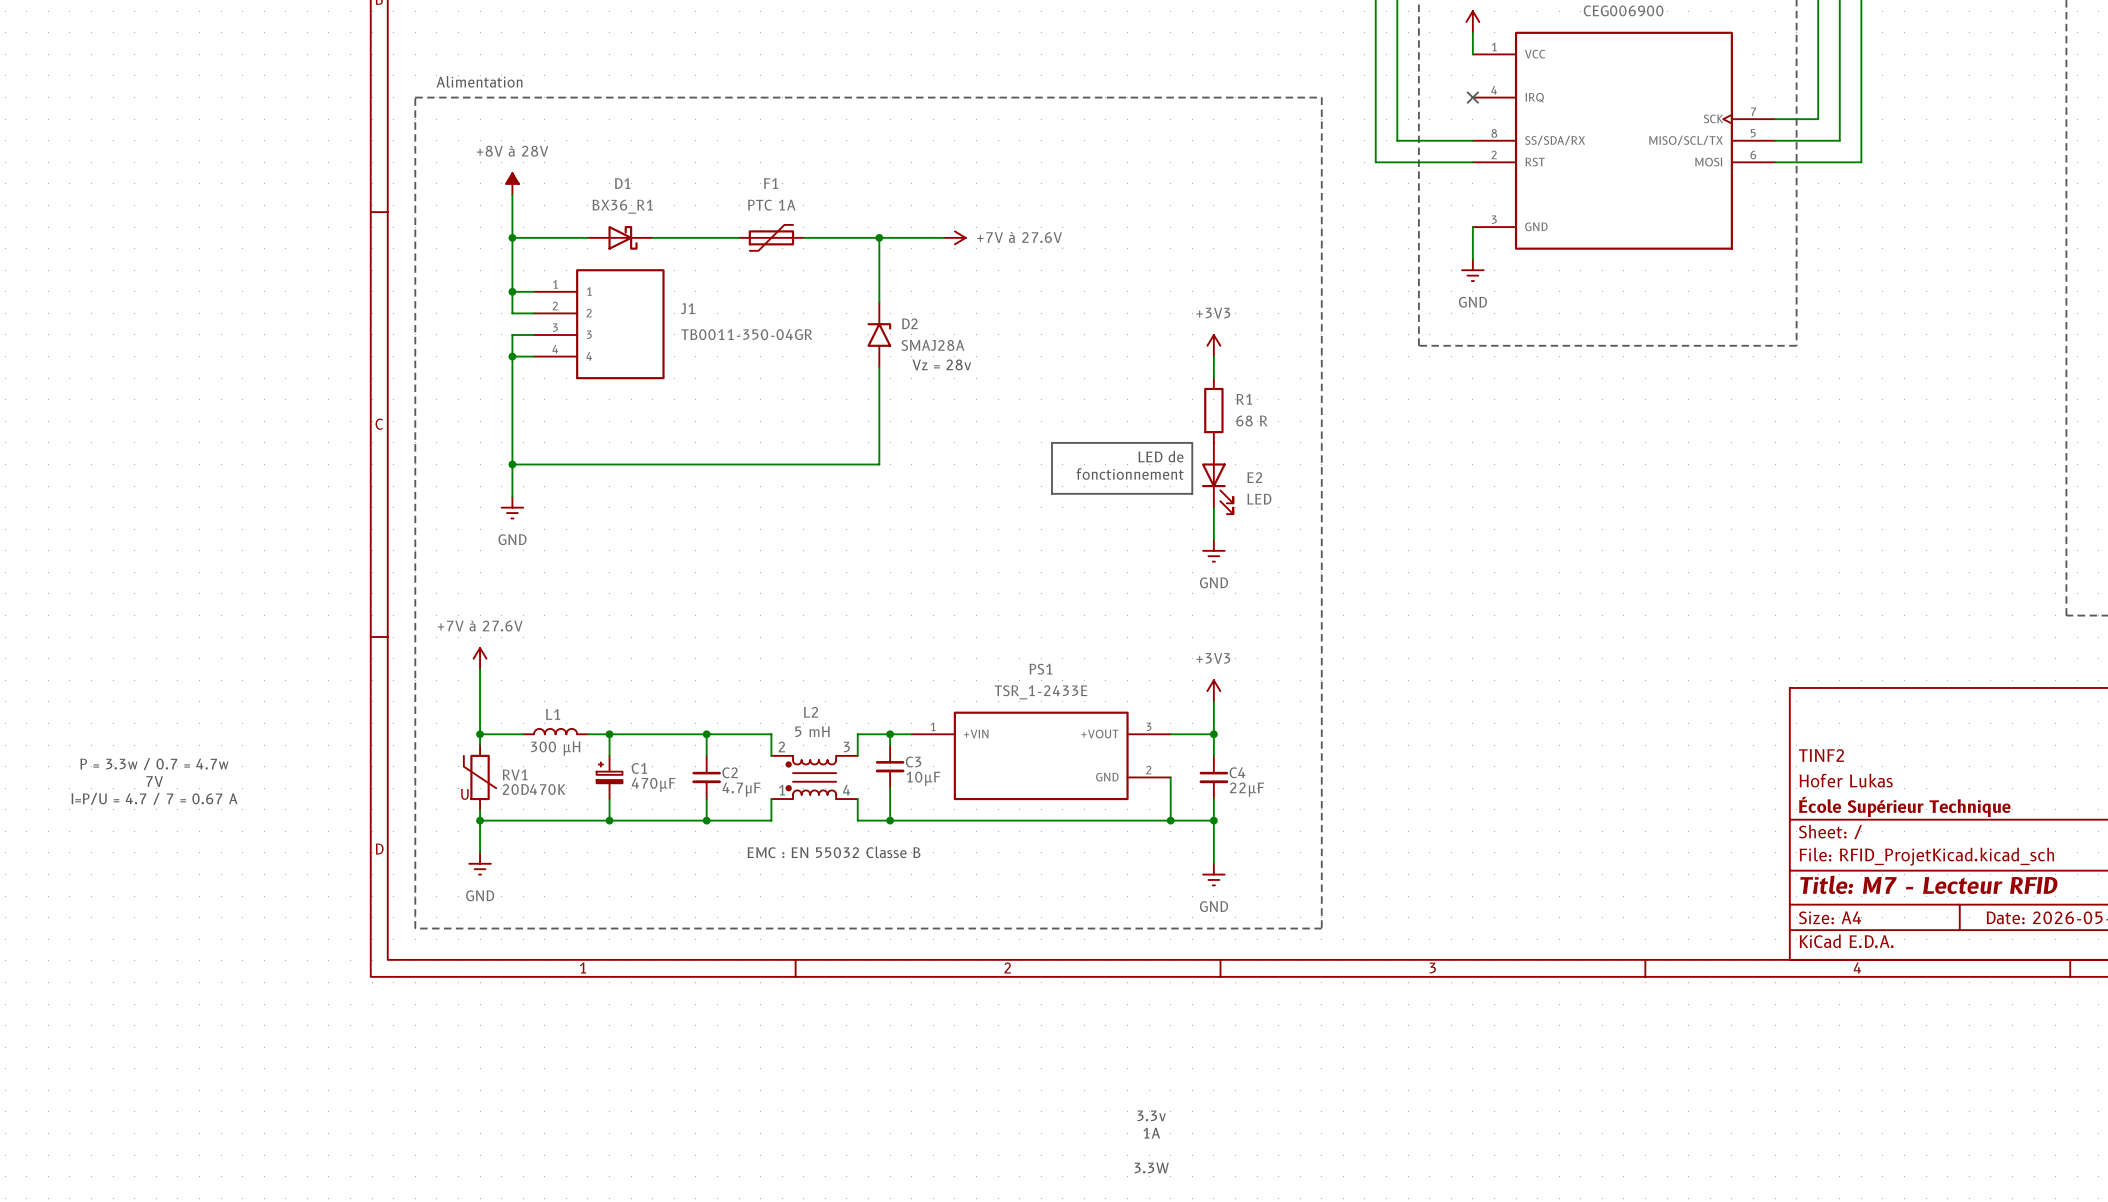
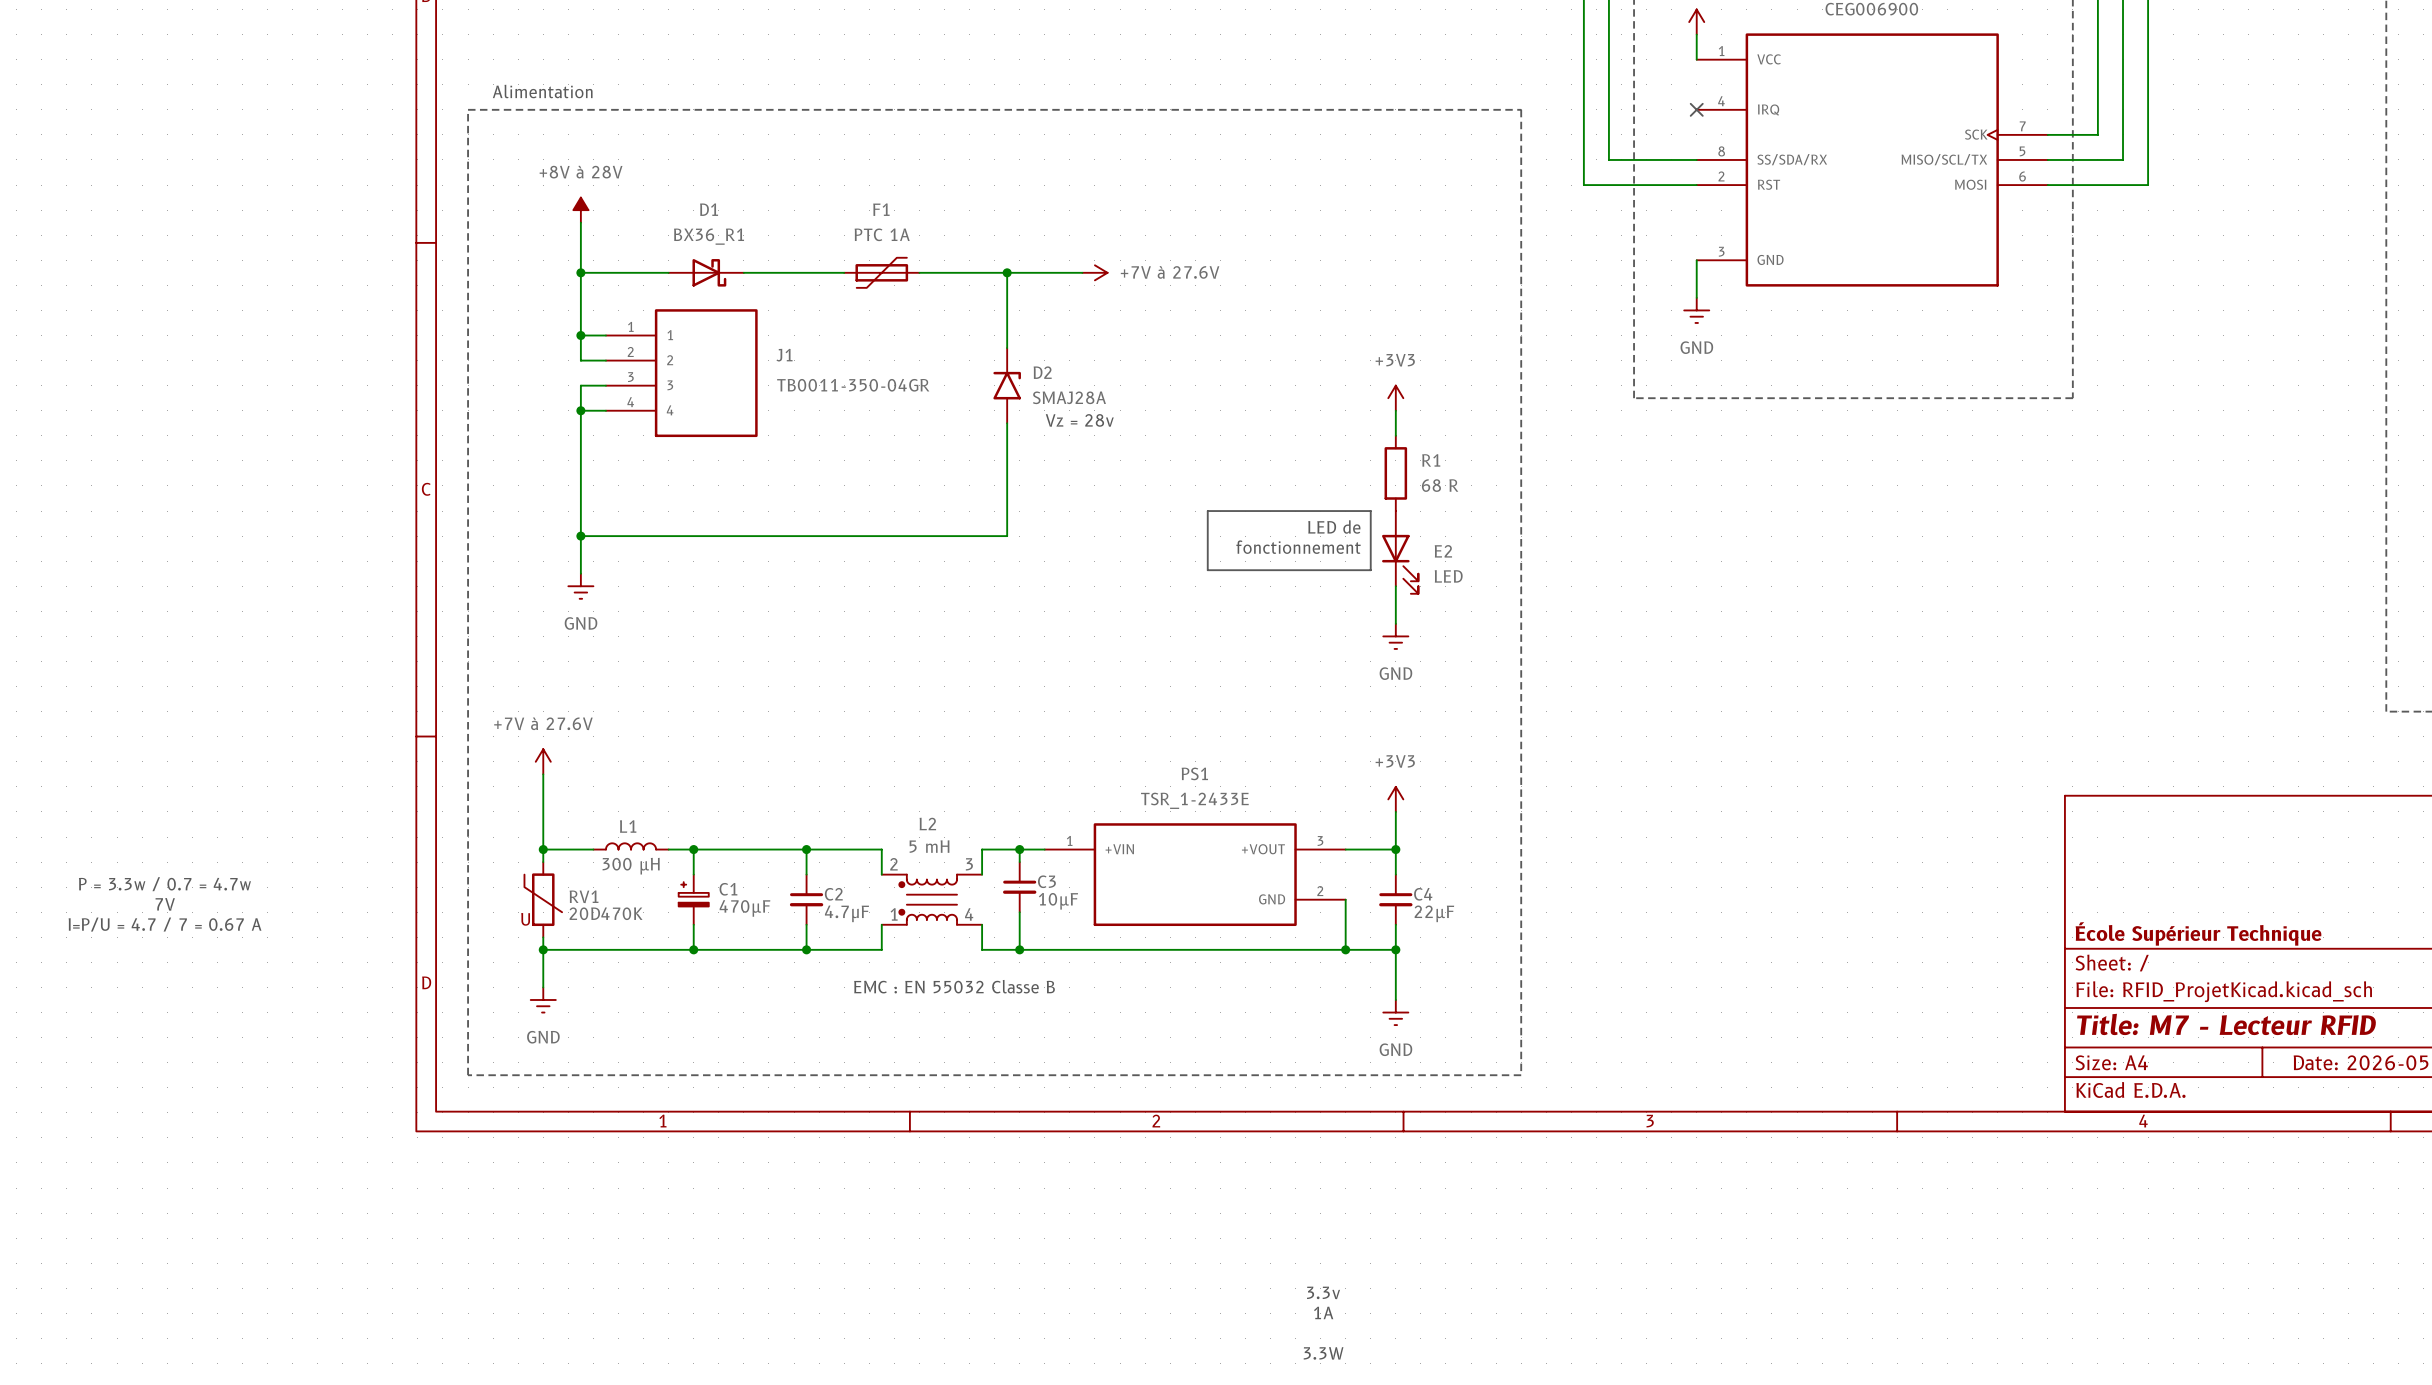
title block: TINF2 (1821, 755) -> none
title block: Hofer Lukas (1846, 780) -> none

